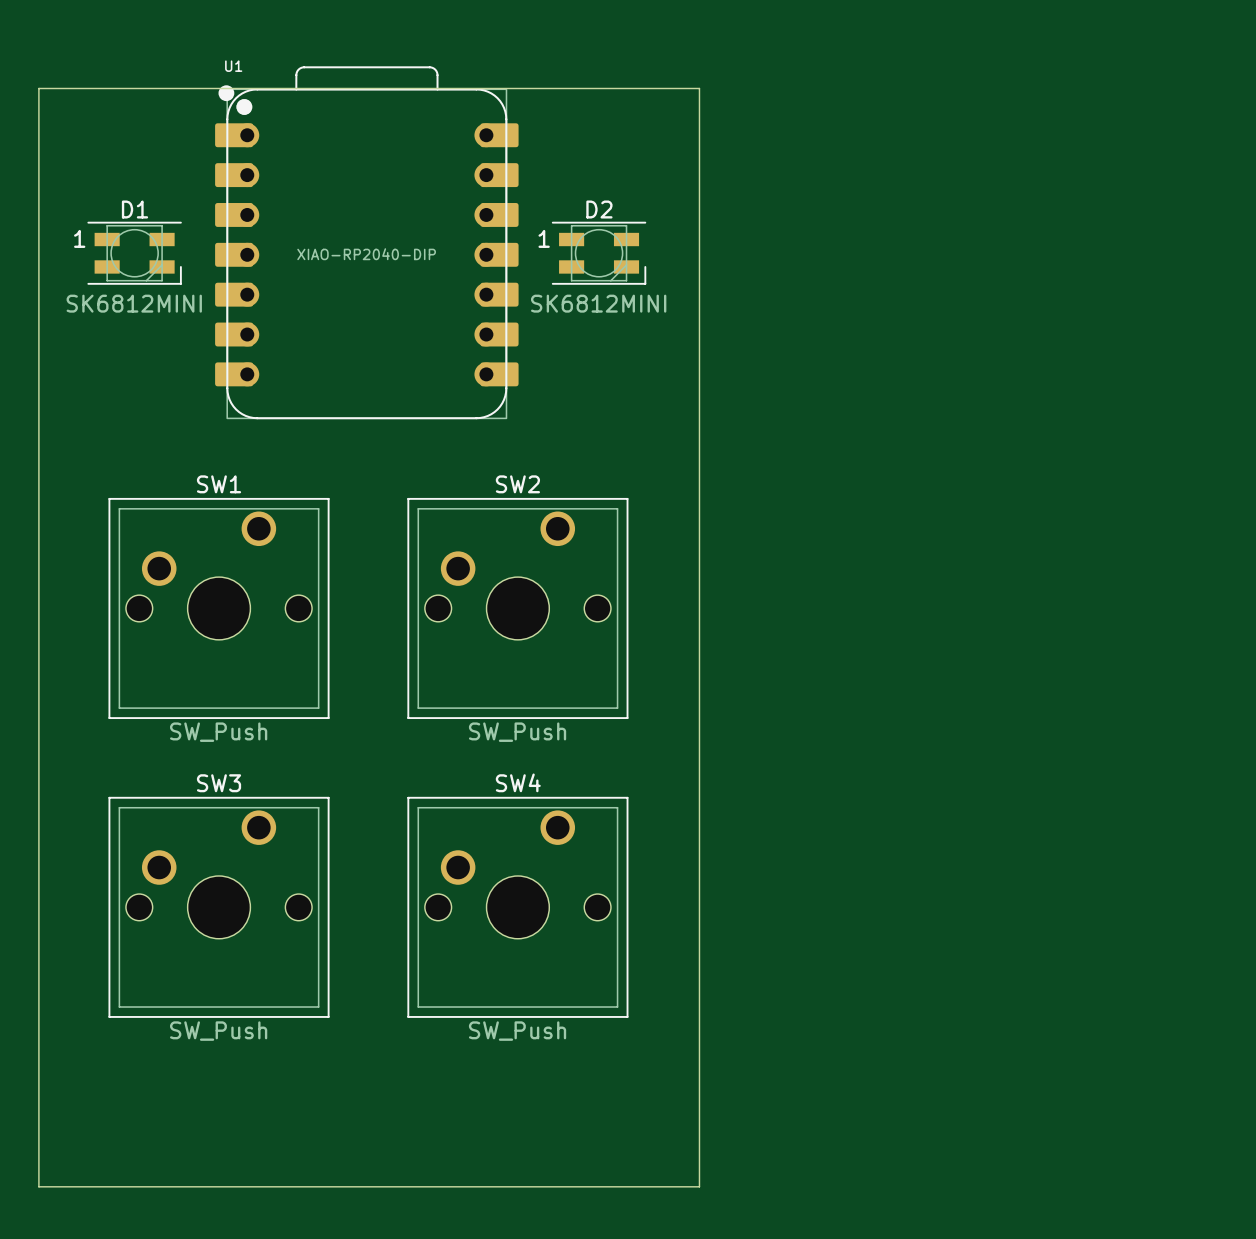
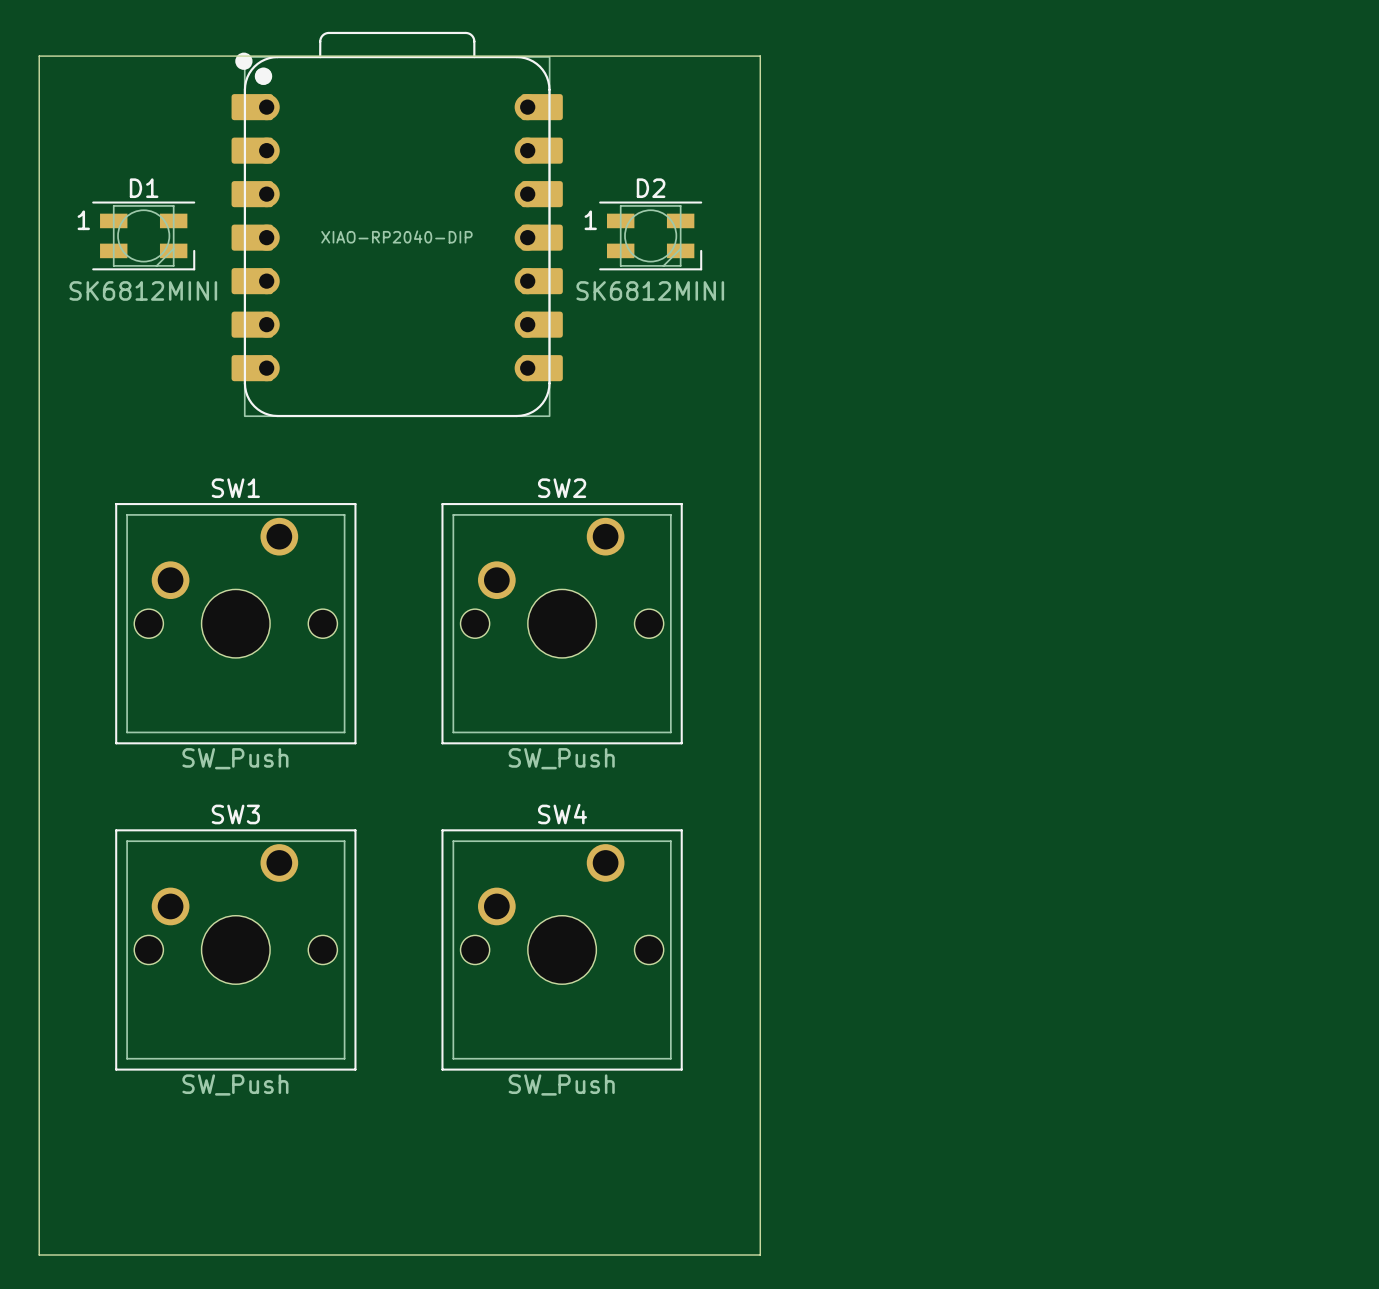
U1 name: U1 (233, 66) -> none

